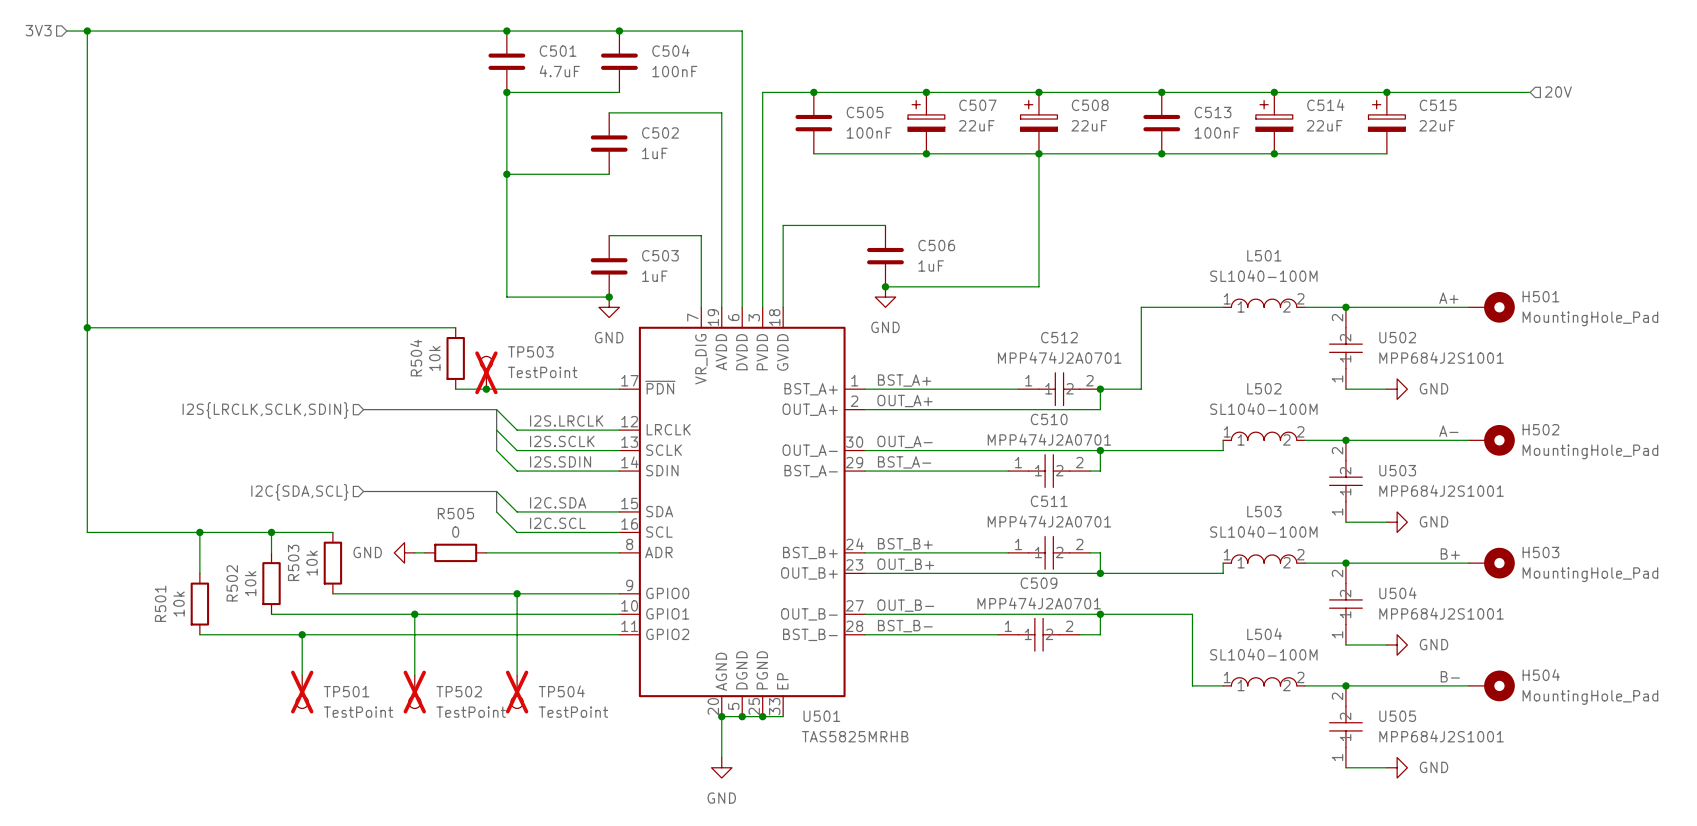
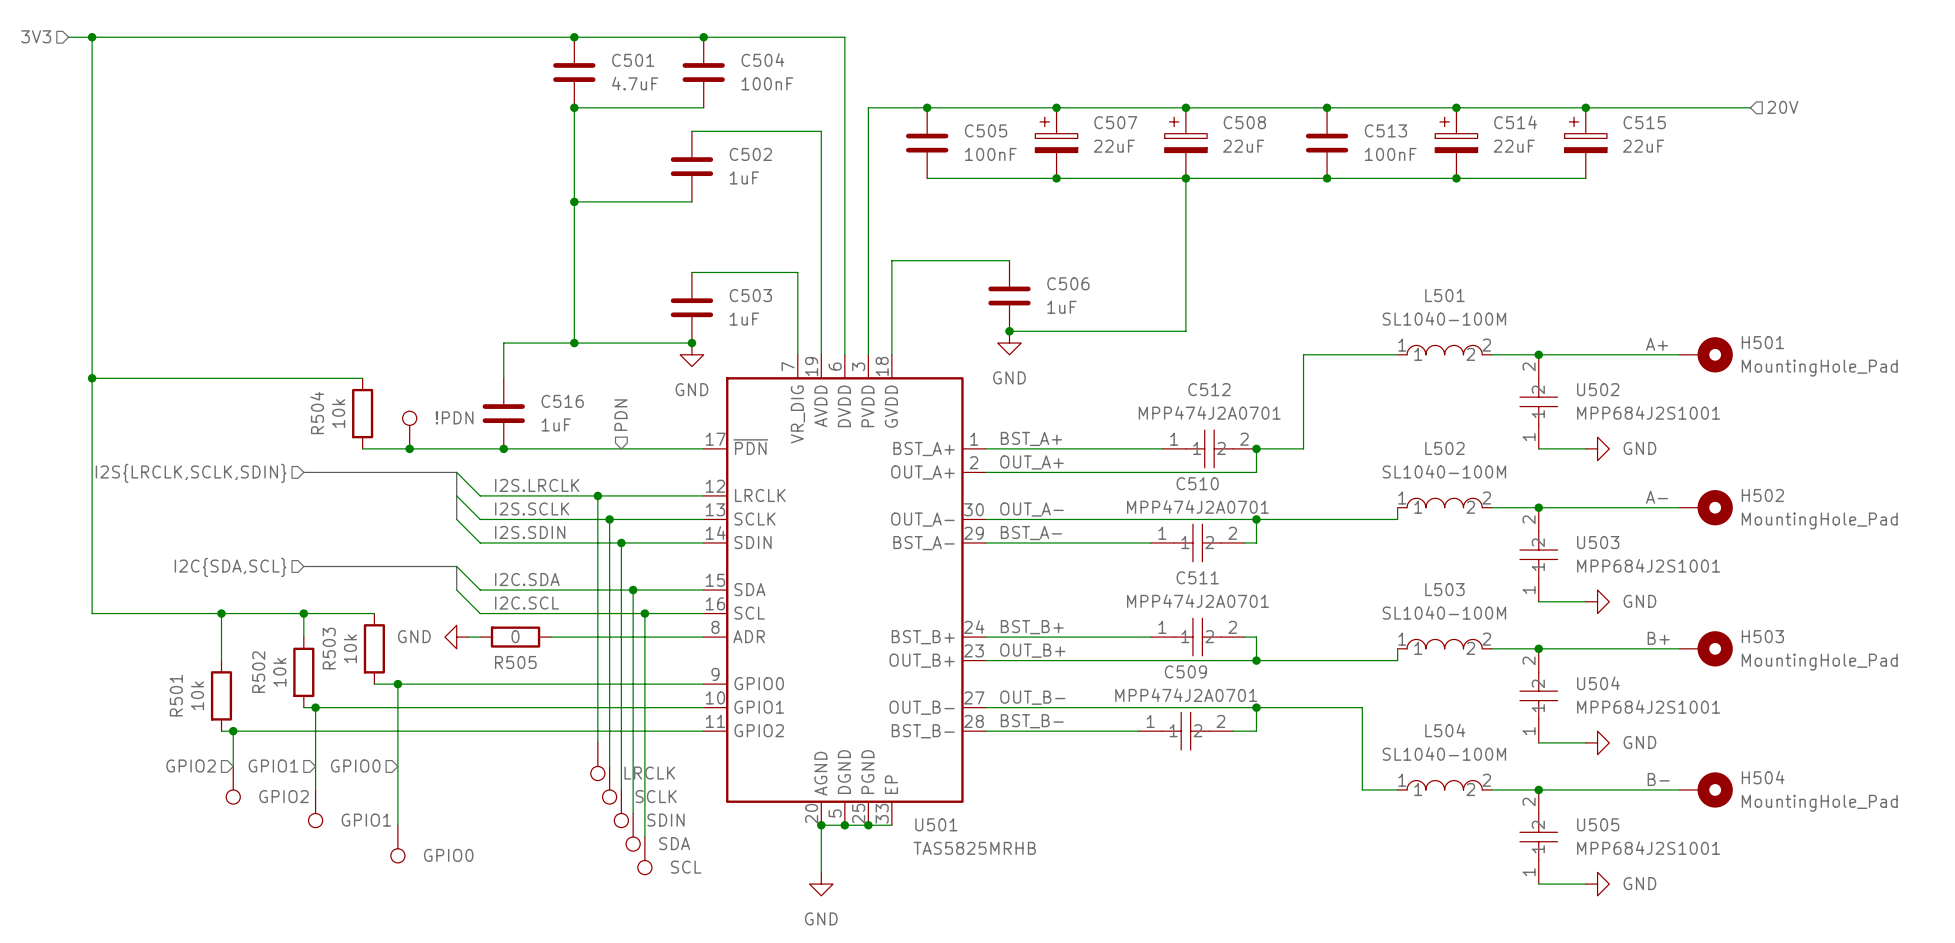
wire: none -> (574, 343) (503, 343) (503, 378)
junction: none -> (574, 343)
wire: (322, 327) (455, 327) -> (362, 448) (515, 448)
C516: none -> 1uF (503, 413)
R504 position: (455, 358) -> (362, 413)
hierarchical label: none -> PDN (620, 415)
part: none -> (409, 430)
TP503: TestPoint (486, 372) -> none
junction: none -> (409, 448)
junction: none -> (503, 448)
junction: (486, 389) -> none
bus: none -> (303, 472) (409, 472)
bus: (404, 409) (496, 409) (496, 450) -> (456, 472) (456, 519)
wire: (496, 409) (517, 430) -> (456, 472) (480, 495) (586, 495)
hierarchical label position: I2S{LRCLK,SCLK,SDIN} (265, 410) -> I2S{LRCLK,SCLK,SDIN} (191, 473)
label position: I2S.LRCLK (566, 420) -> I2S.LRCLK (537, 485)
wire: (496, 430) (517, 450) -> (456, 495) (480, 519) (586, 519)
wire: none -> (597, 495) (597, 742)
junction: none -> (597, 495)
label position: I2S.SCLK (562, 441) -> I2S.SCLK (532, 508)
wire: (496, 450) (517, 471) -> (456, 519) (480, 542) (586, 542)
wire: none -> (609, 519) (609, 766)
junction: none -> (609, 519)
label position: I2S.SDIN (560, 461) -> I2S.SDIN (530, 532)
wire: none -> (621, 542) (621, 789)
junction: none -> (621, 542)
bus: none -> (303, 566) (409, 566)
bus: (404, 491) (496, 491) (496, 511) -> (456, 566) (456, 590)
wire: (496, 491) (517, 511) -> (456, 566) (480, 590) (586, 590)
hierarchical label position: I2C{SDA,SCL} (299, 492) -> I2C{SDA,SCL} (230, 567)
label position: I2C.SDA (558, 502) -> I2C.SDA (527, 579)
wire: (496, 511) (517, 532) -> (456, 590) (480, 613) (586, 613)
wire: none -> (633, 590) (633, 813)
junction: none -> (633, 590)
R505 name position: R505 (455, 513) -> R505 (515, 662)
label position: I2C.SCL (557, 523) -> I2C.SCL (527, 603)
R505 value position: 0 (455, 532) -> 0 (515, 636)
wire: none -> (644, 613) (644, 837)
junction: none -> (644, 613)
wire: none -> (397, 684) (397, 825)
junction: none -> (397, 684)
wire: (517, 593) (517, 675) -> none
junction: (517, 593) -> none
wire: none -> (315, 707) (315, 789)
wire: (414, 614) (414, 675) -> none
junction: (414, 614) -> none
wire: none -> (233, 731) (233, 766)
junction: none -> (233, 731)
wire: (302, 634) (302, 675) -> none
junction position: (302, 634) -> (315, 707)
part: none -> (597, 761)
hierarchical label: none -> GPIO2 (191, 766)
hierarchical label: none -> GPIO1 (273, 766)
hierarchical label: none -> GPIO0 (355, 766)
part: none -> (233, 785)
part: none -> (609, 785)
TP501: TestPoint (302, 692) -> none
TP502: TestPoint (414, 692) -> none
TP504: TestPoint (517, 692) -> none
part: none -> (315, 808)
part: none -> (621, 808)
part: none -> (633, 832)
part: none -> (397, 844)
part: none -> (644, 855)

